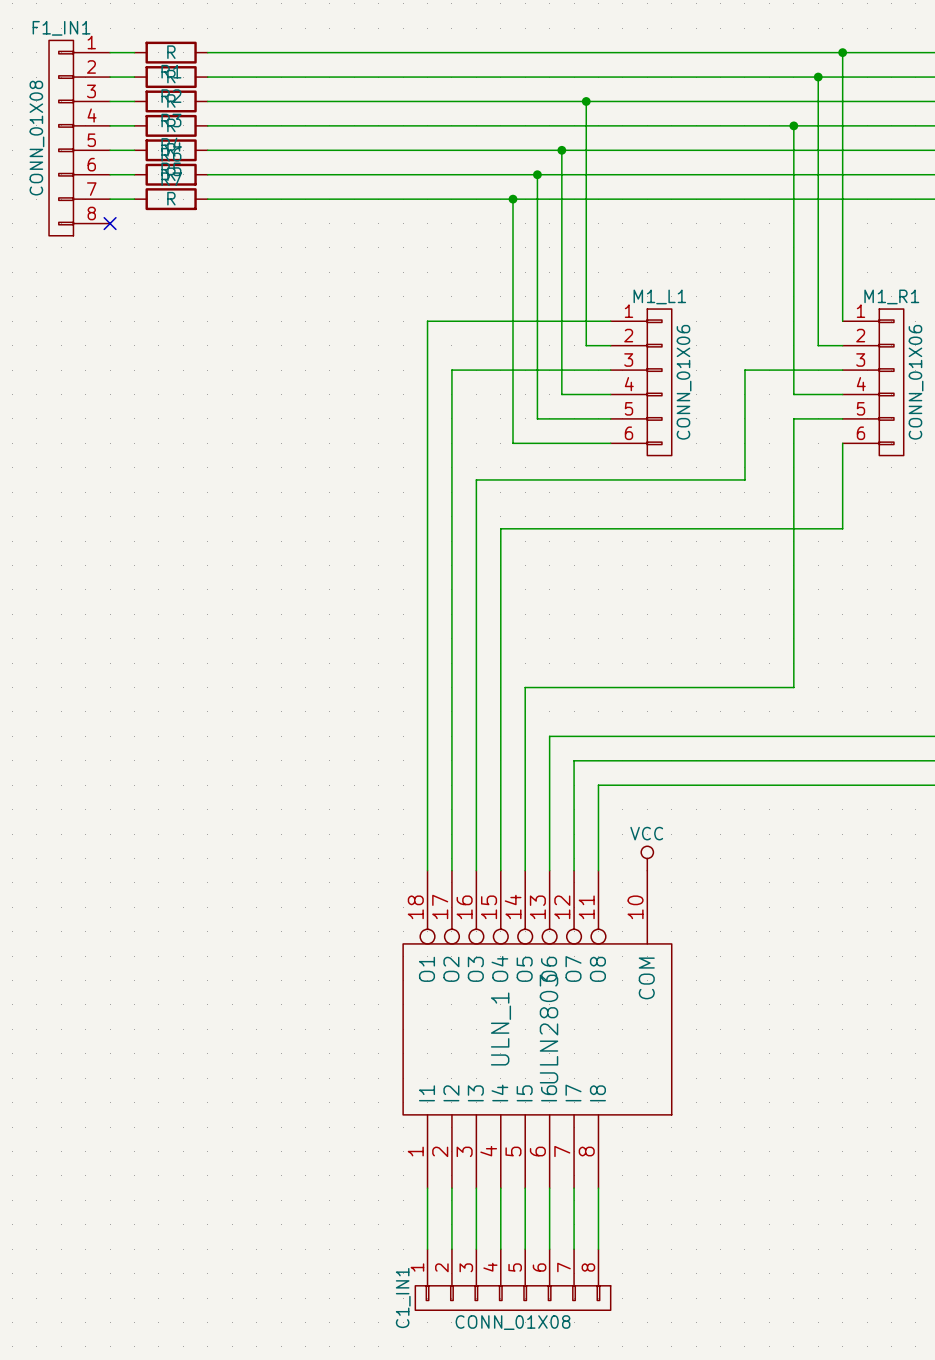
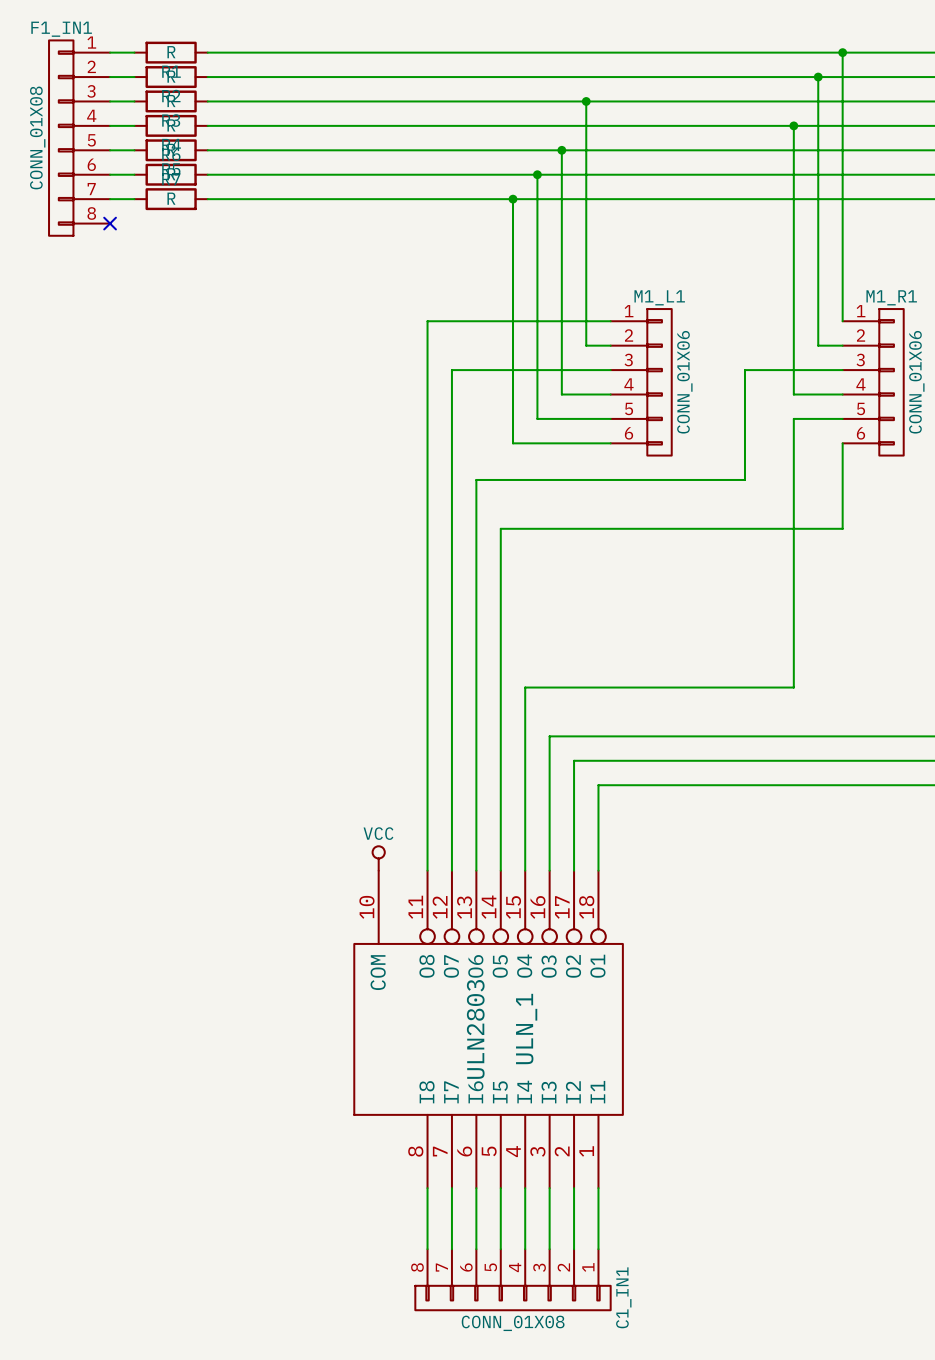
power symbol: none -> VCC (378, 858)
power symbol: VCC (647, 858) -> none
ULN_1 flip: as is (537, 1029) -> left-right (488, 1029)
C1_IN1 flip: as is (513, 1298) -> left-right (513, 1298)

